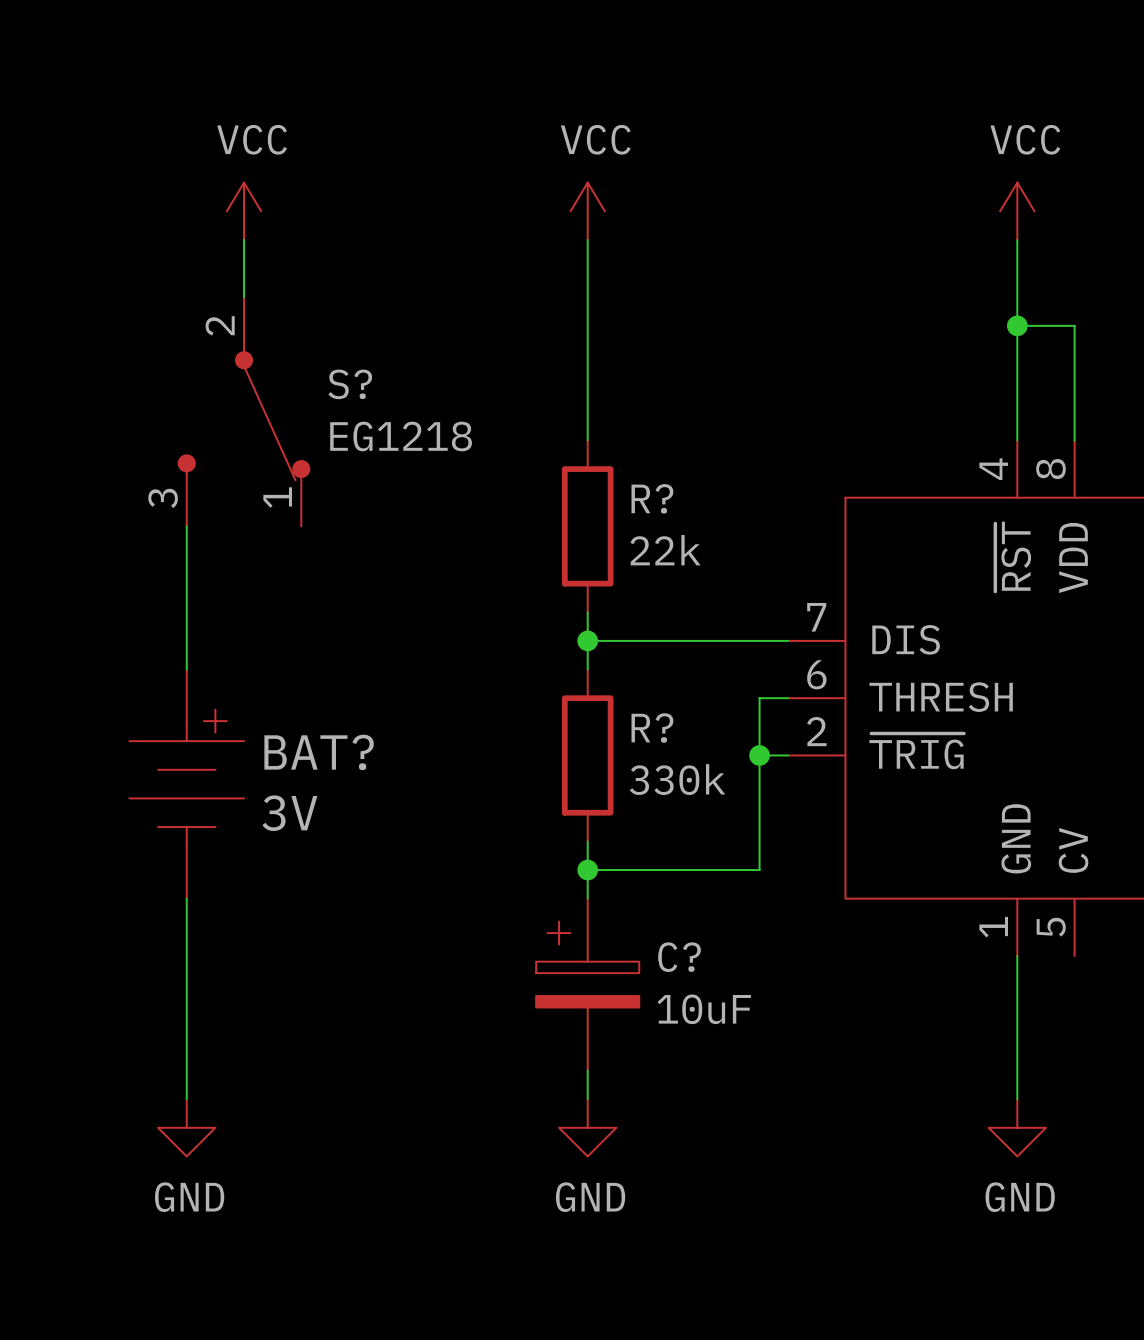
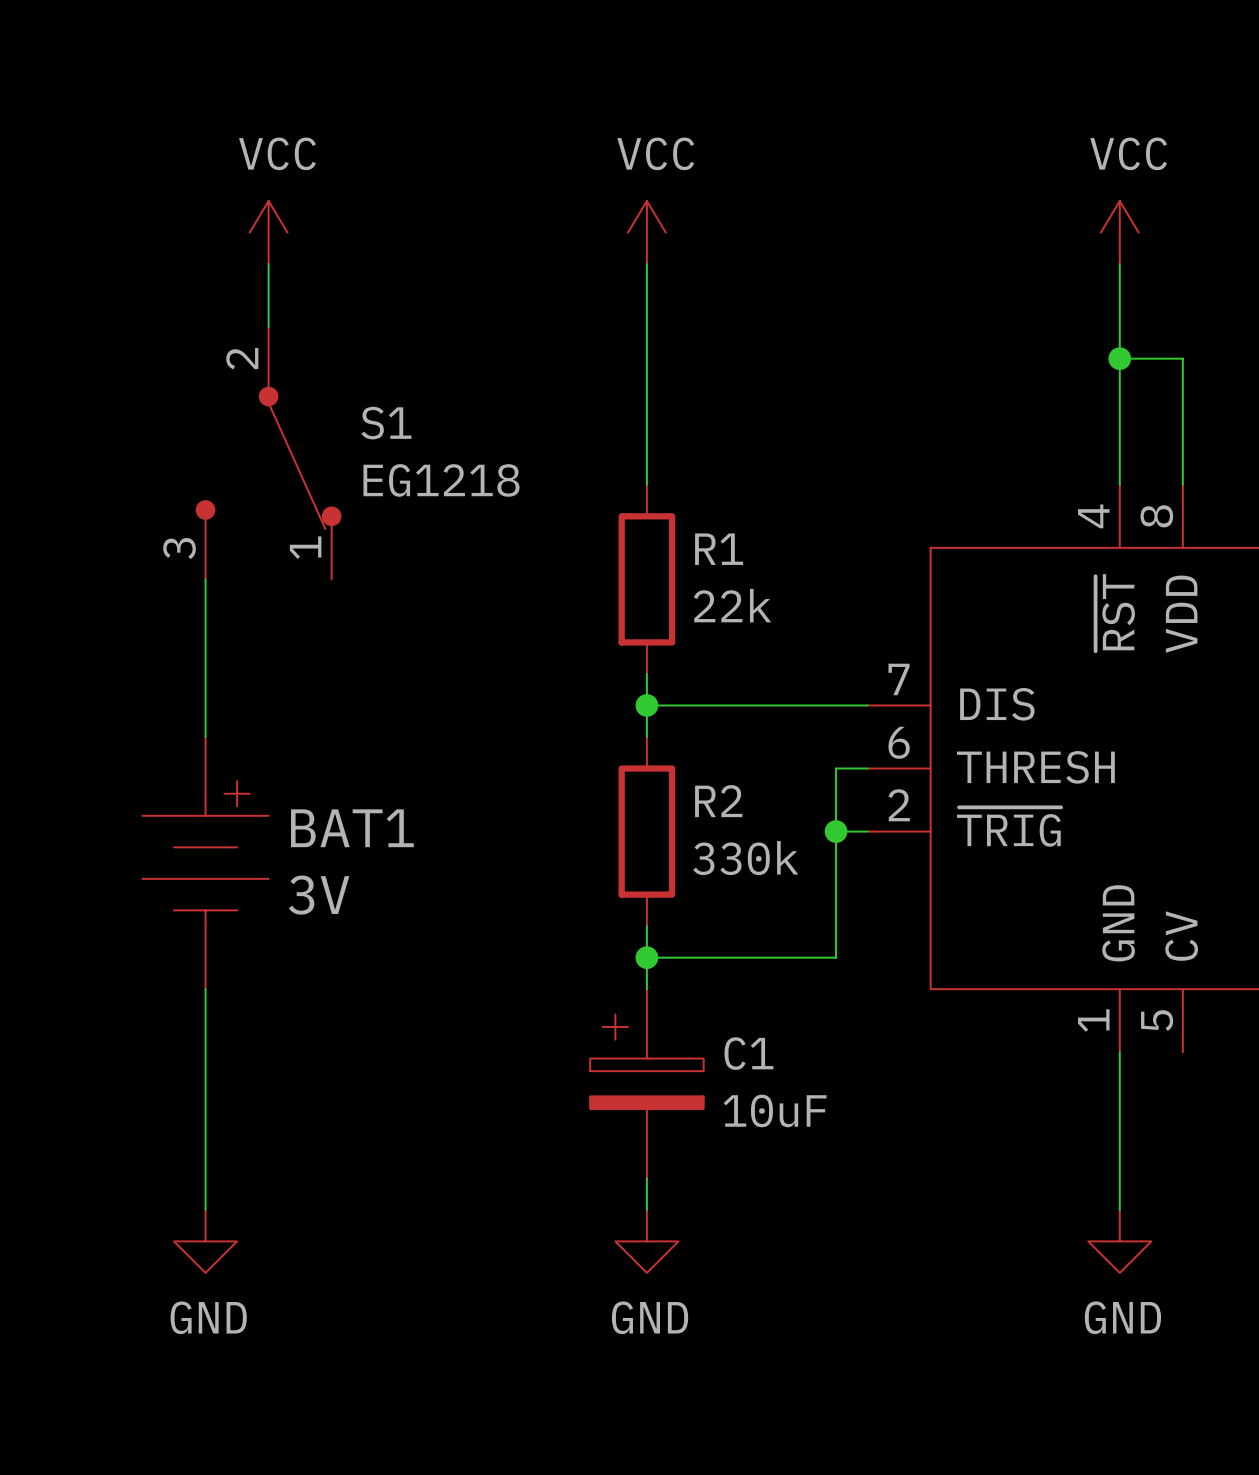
S? name: S? (350, 384) -> S1 (386, 423)
R? name: R? (652, 498) -> R1 (719, 549)
R? name: R? (652, 727) -> R2 (718, 801)
BAT? name: BAT? (319, 752) -> BAT1 (352, 828)
C? name: C? (679, 957) -> C1 (748, 1053)

